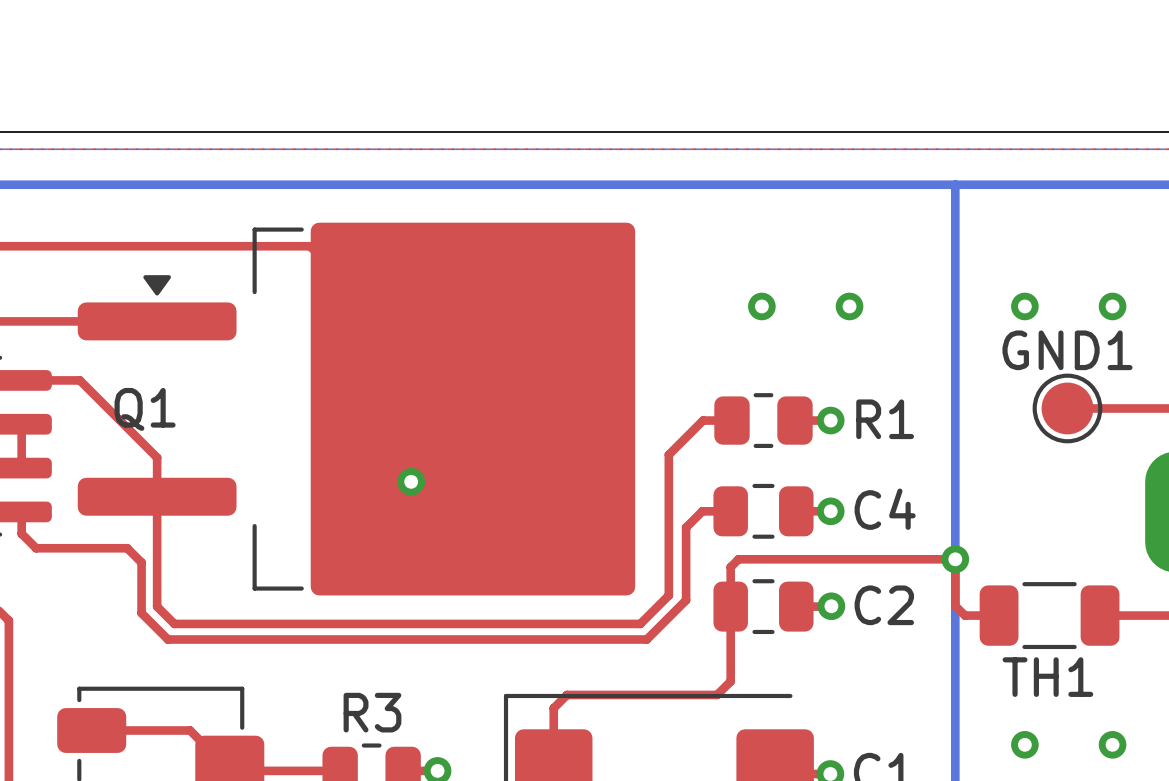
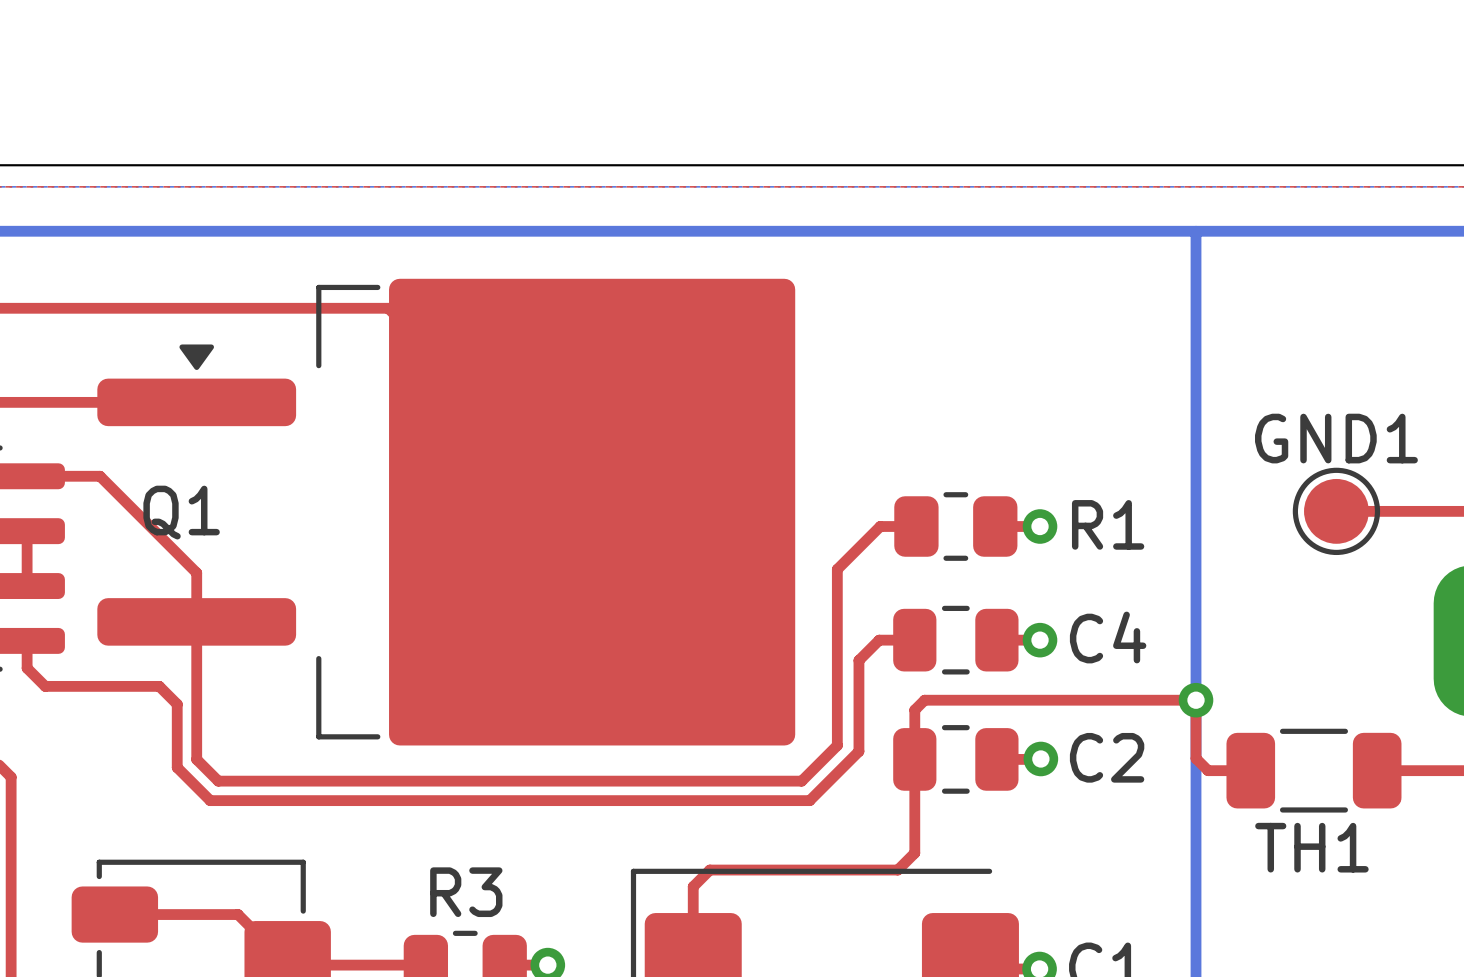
via: (761, 306) -> none
via: (849, 306) -> none
via: (1024, 306) -> none
via: (1112, 306) -> none
via: (411, 481) -> none
via: (1024, 744) -> none
via: (1112, 744) -> none

